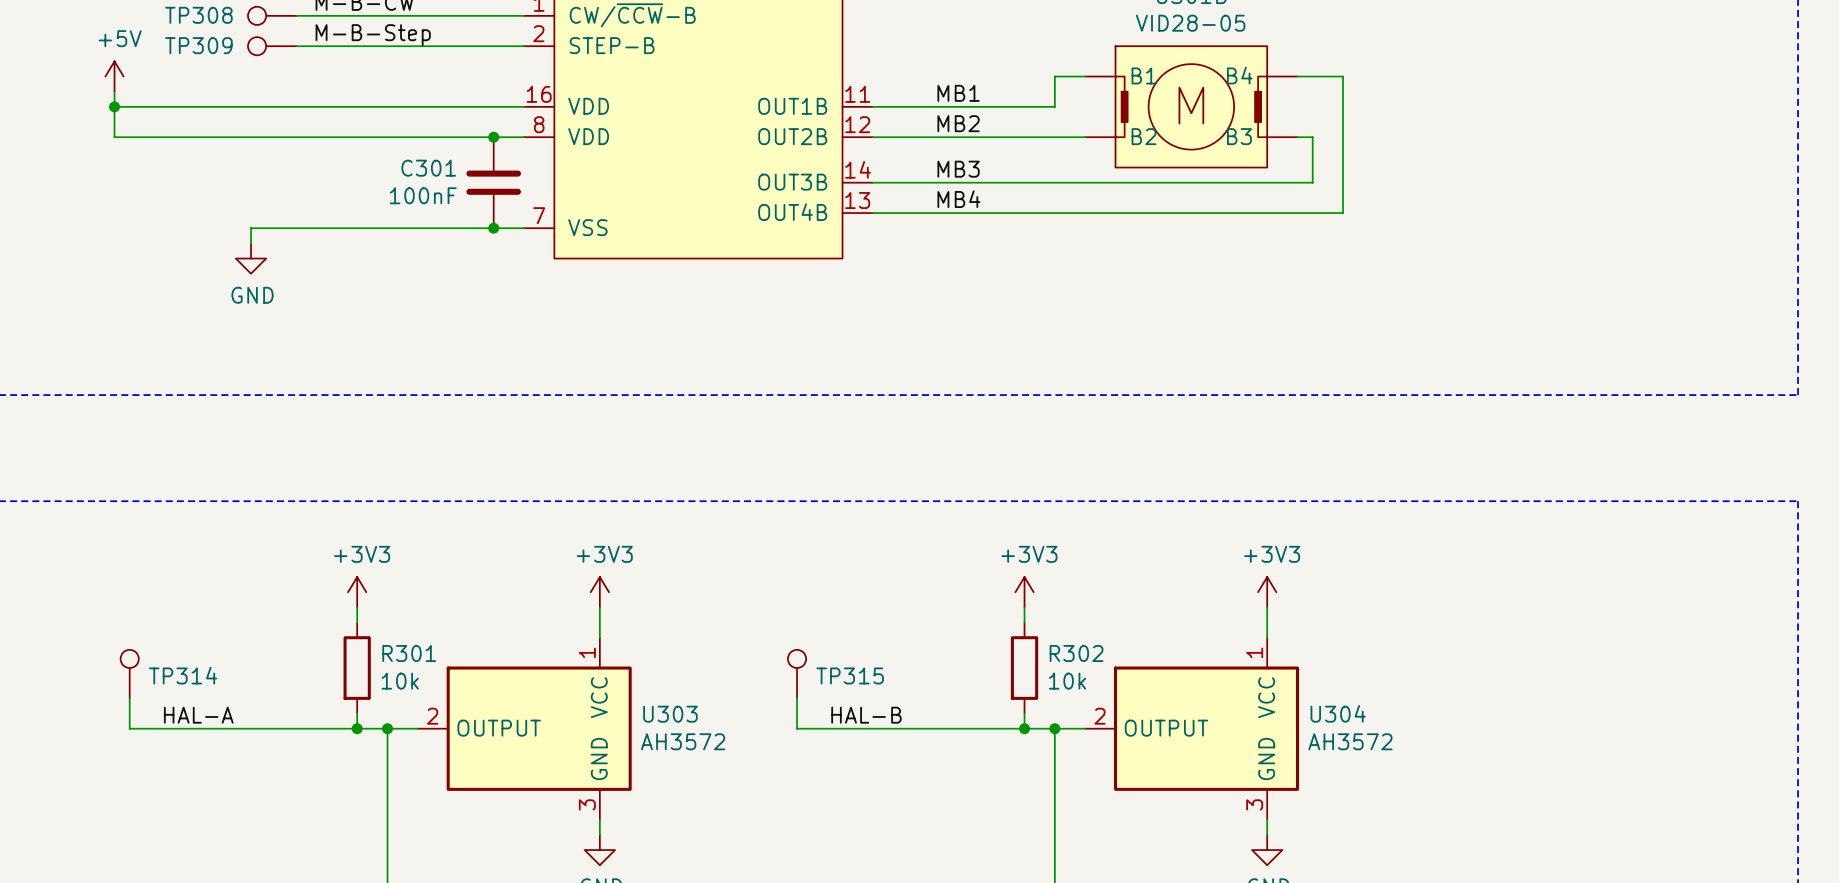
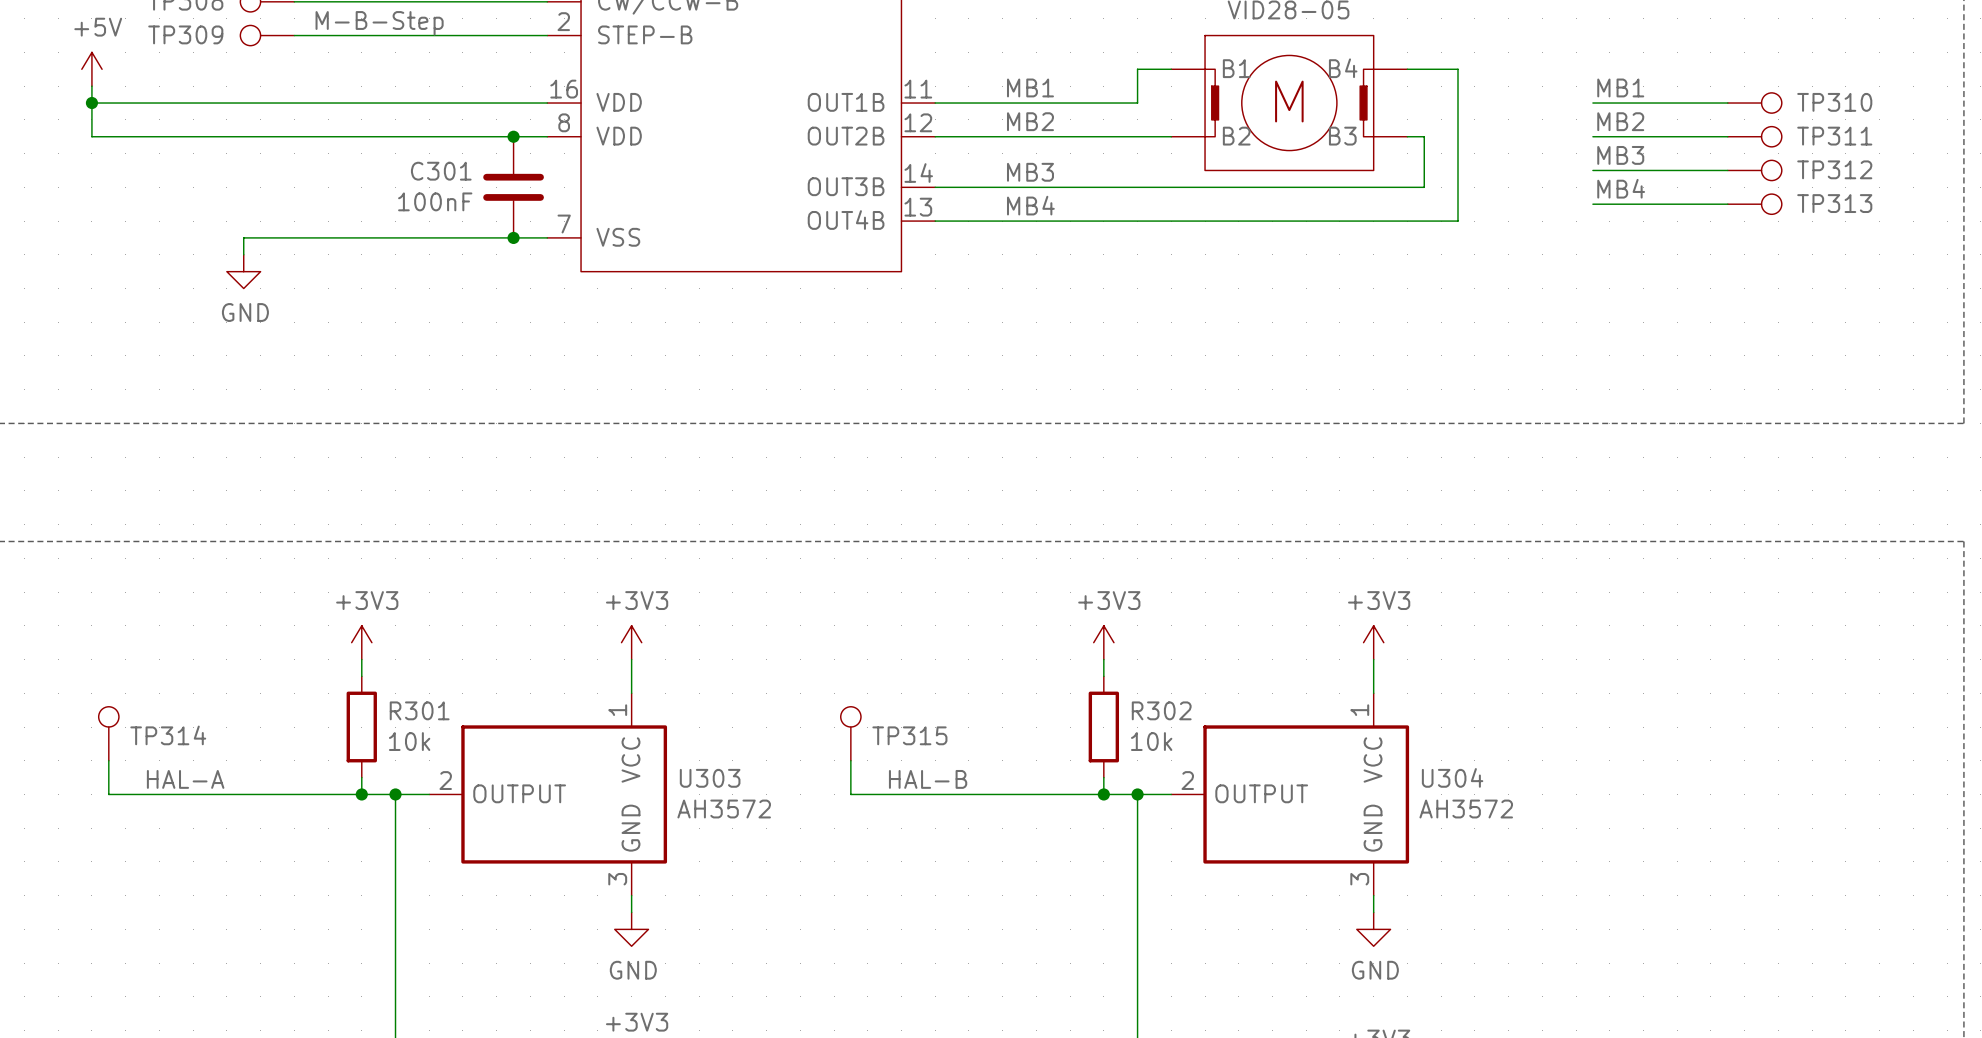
label: none -> MB1 (1620, 87)
wire: none -> (1592, 103) (1727, 103)
TP310: none -> (1754, 103)
label: none -> MB2 (1620, 121)
wire: none -> (1592, 136) (1727, 136)
TP311: none -> (1754, 136)
label: none -> MB3 (1620, 155)
wire: none -> (1592, 170) (1727, 170)
TP312: none -> (1754, 170)
label: none -> MB4 (1621, 188)
wire: none -> (1592, 204) (1727, 204)
TP313: none -> (1754, 204)

